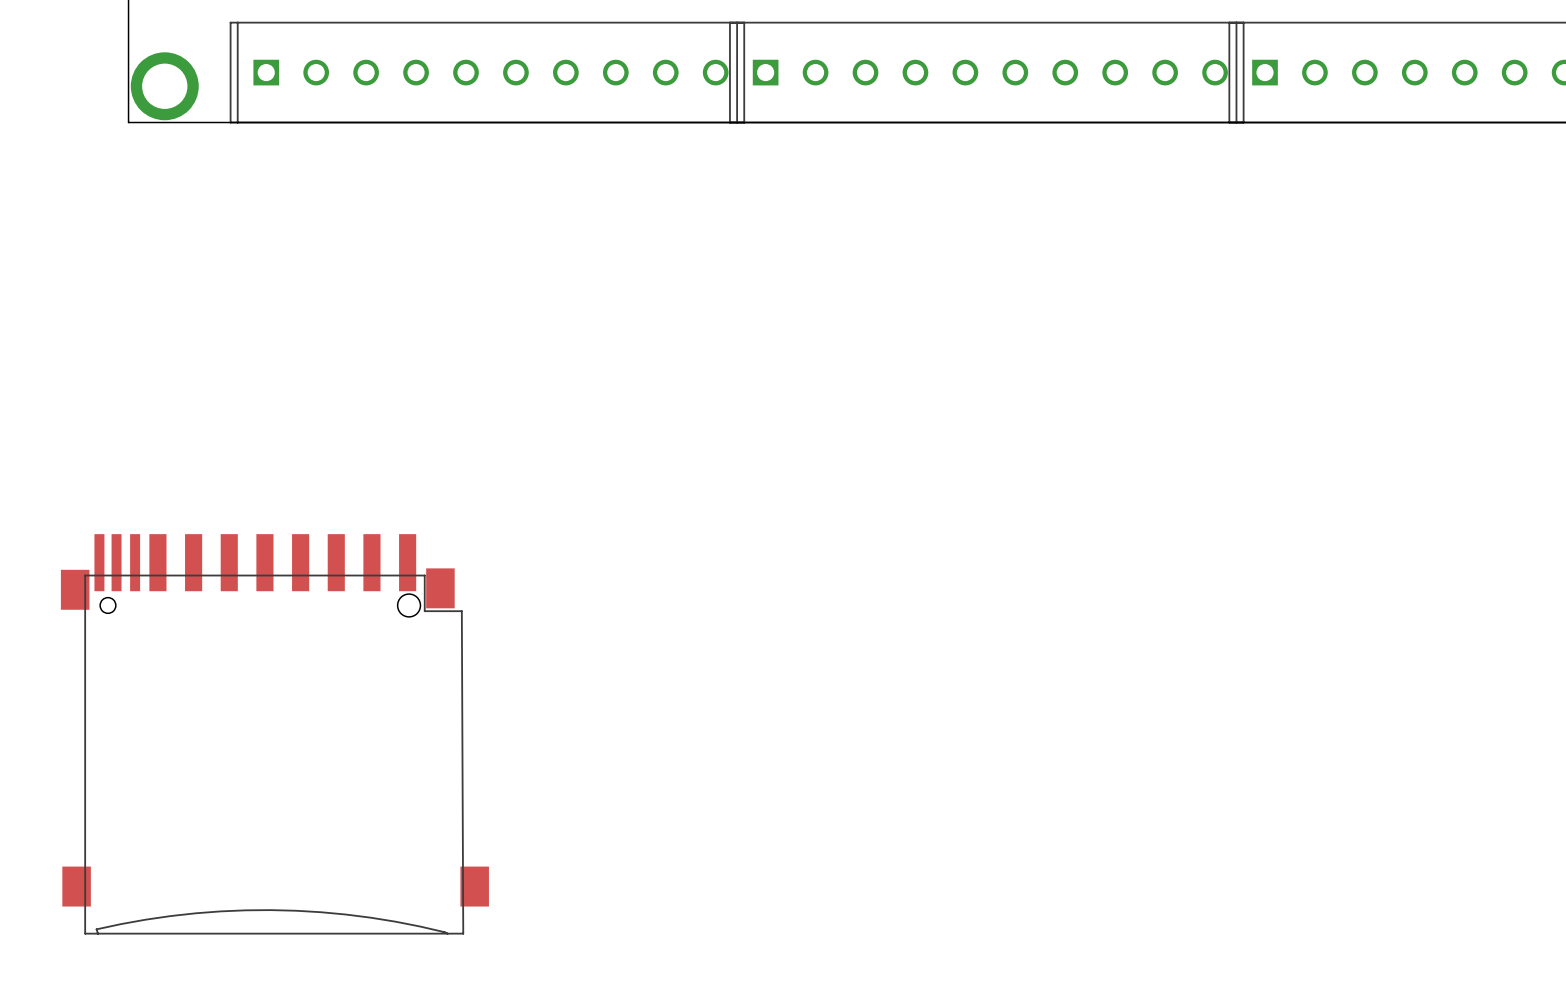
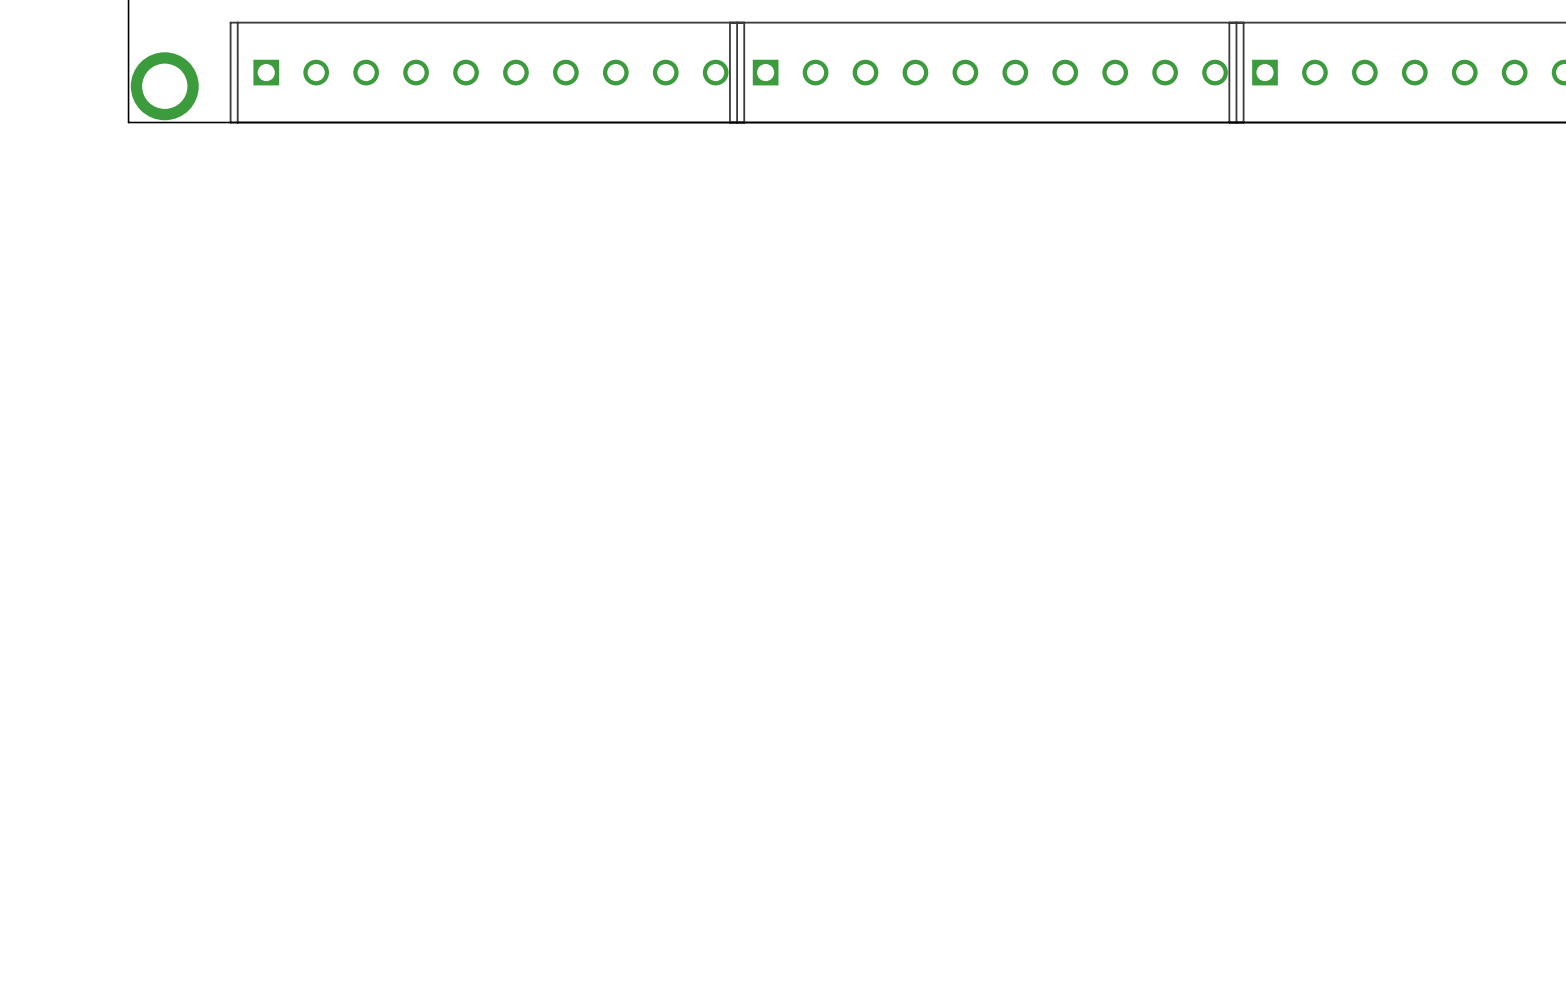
part: (274, 734) -> none

